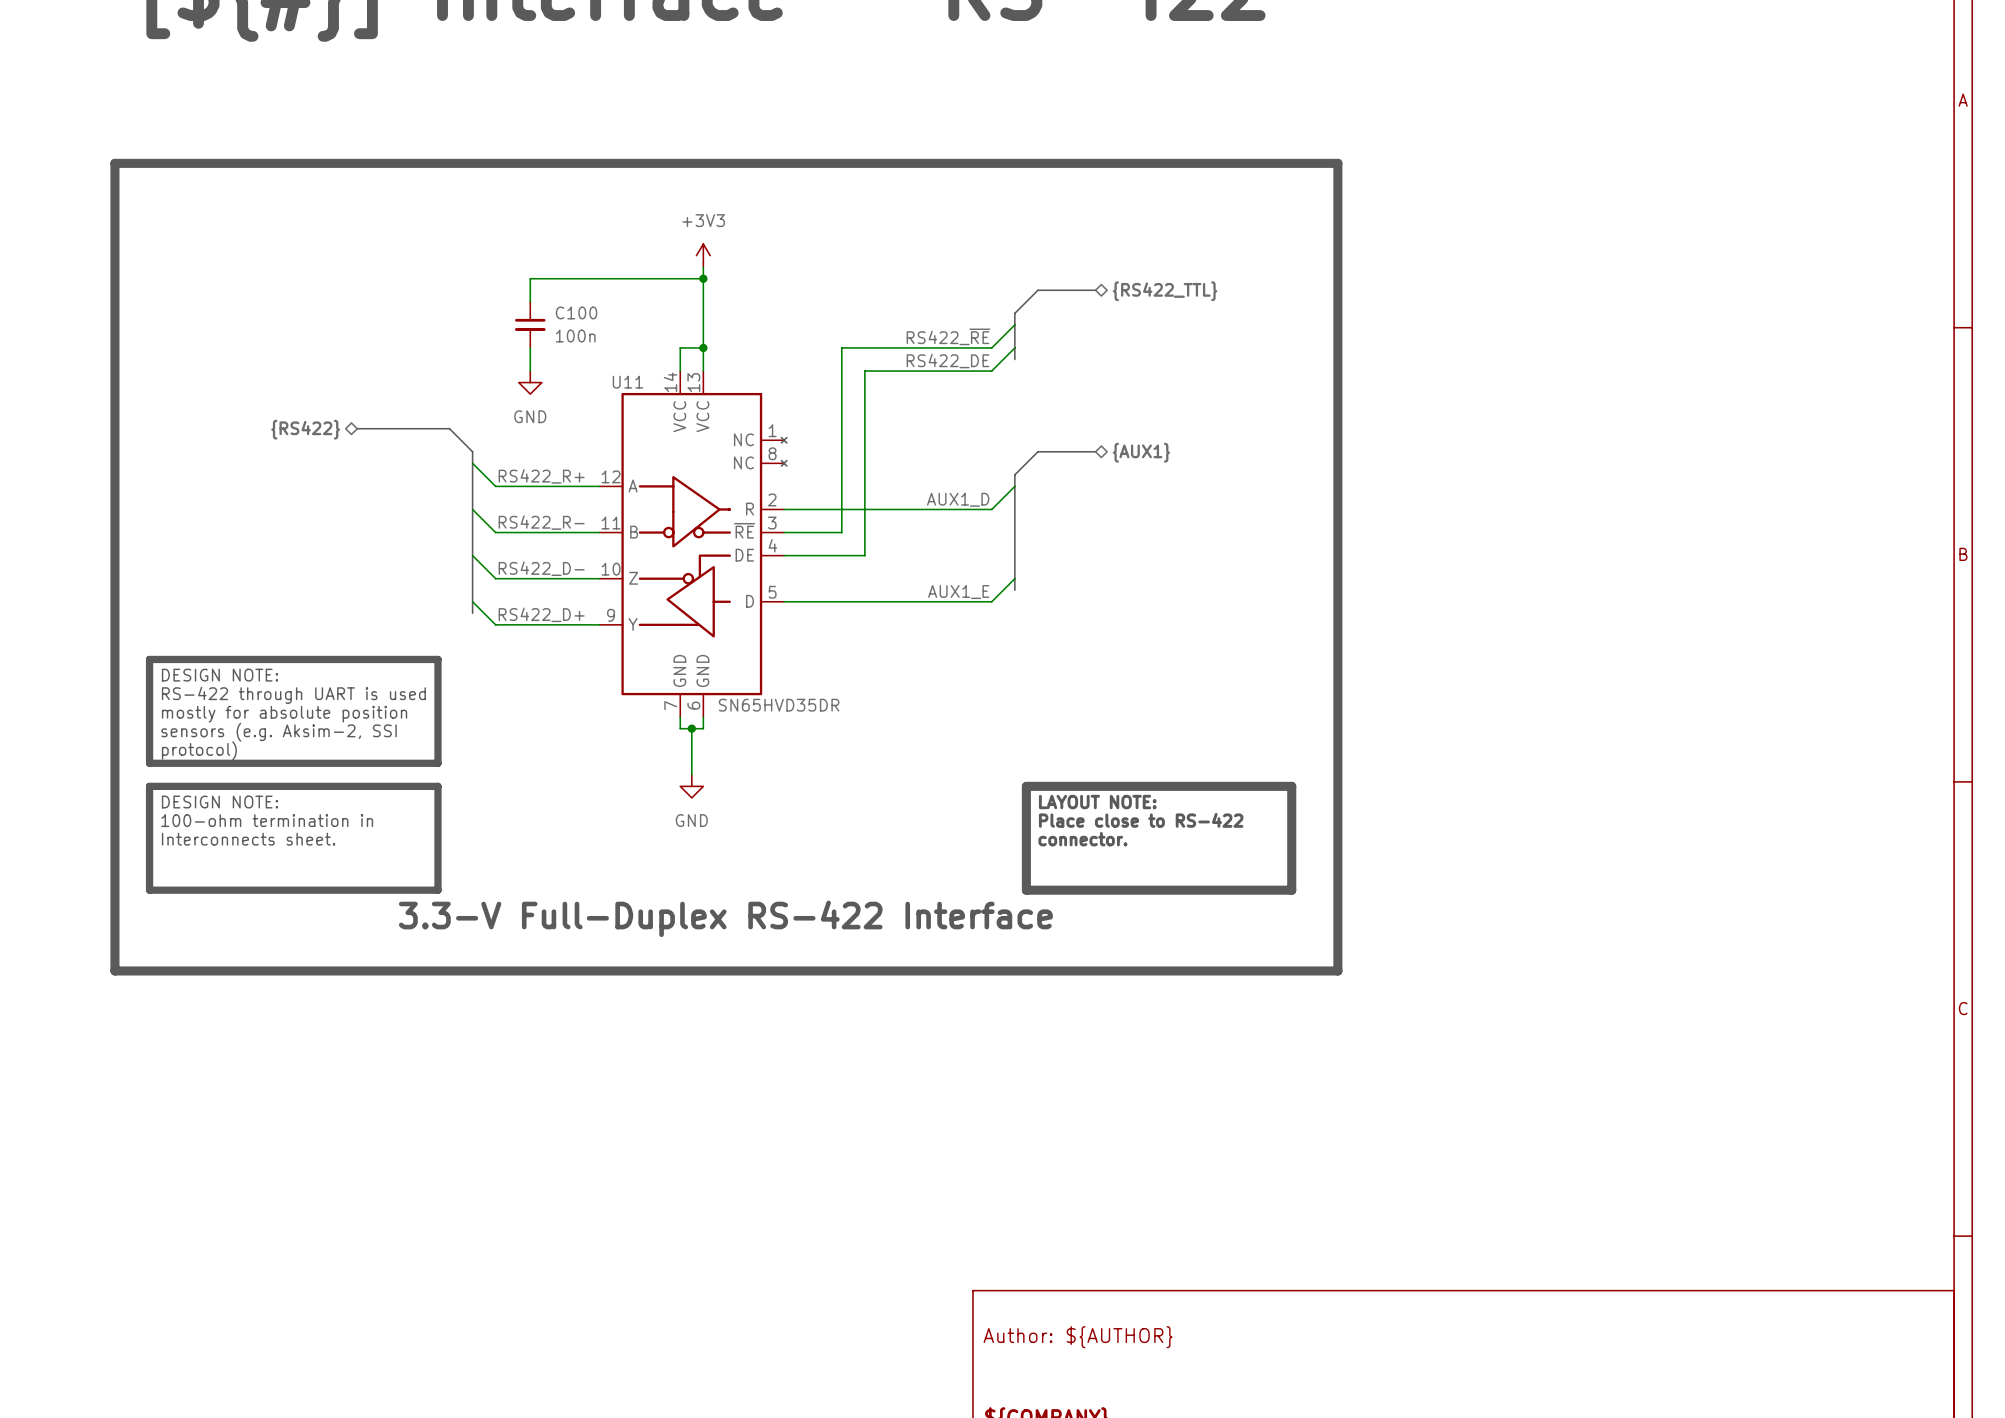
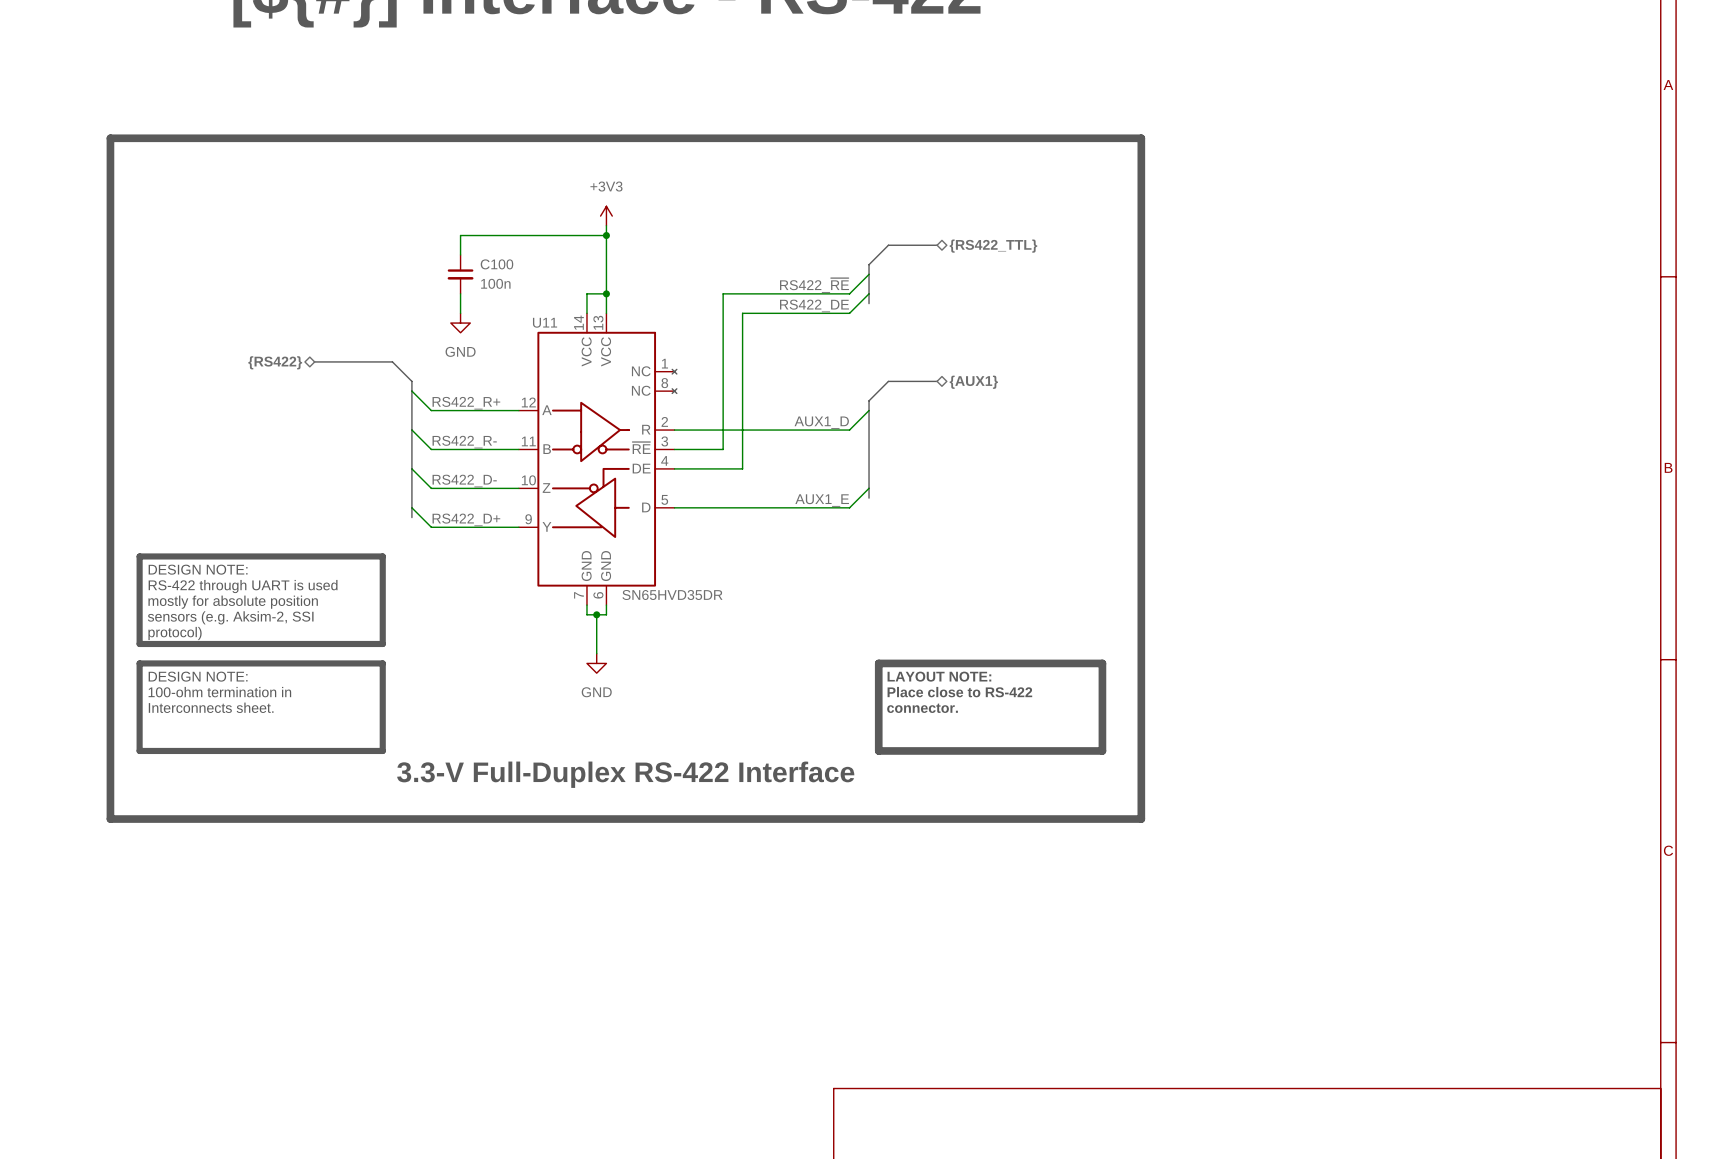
title block: Author: ${AUTHOR} (1078, 1337) -> none

